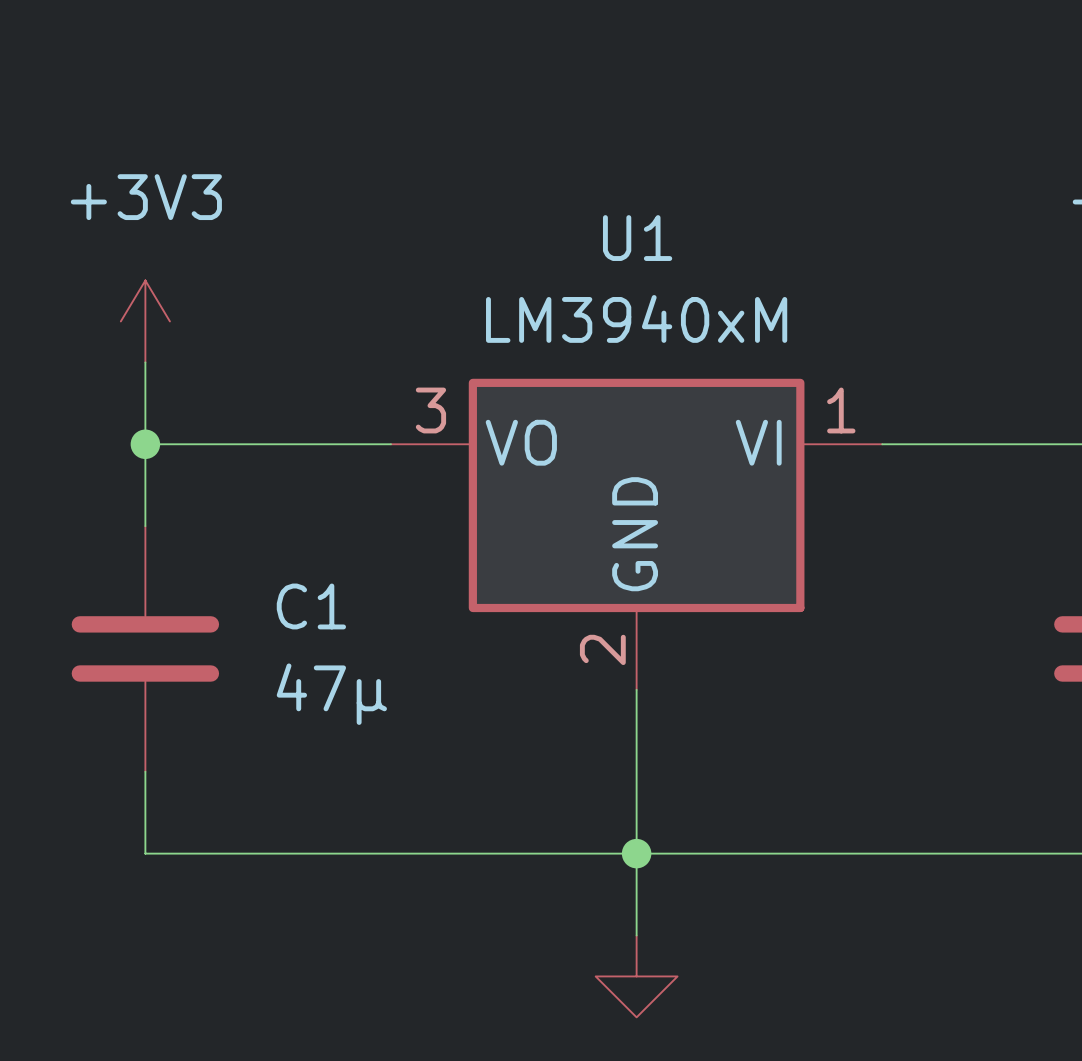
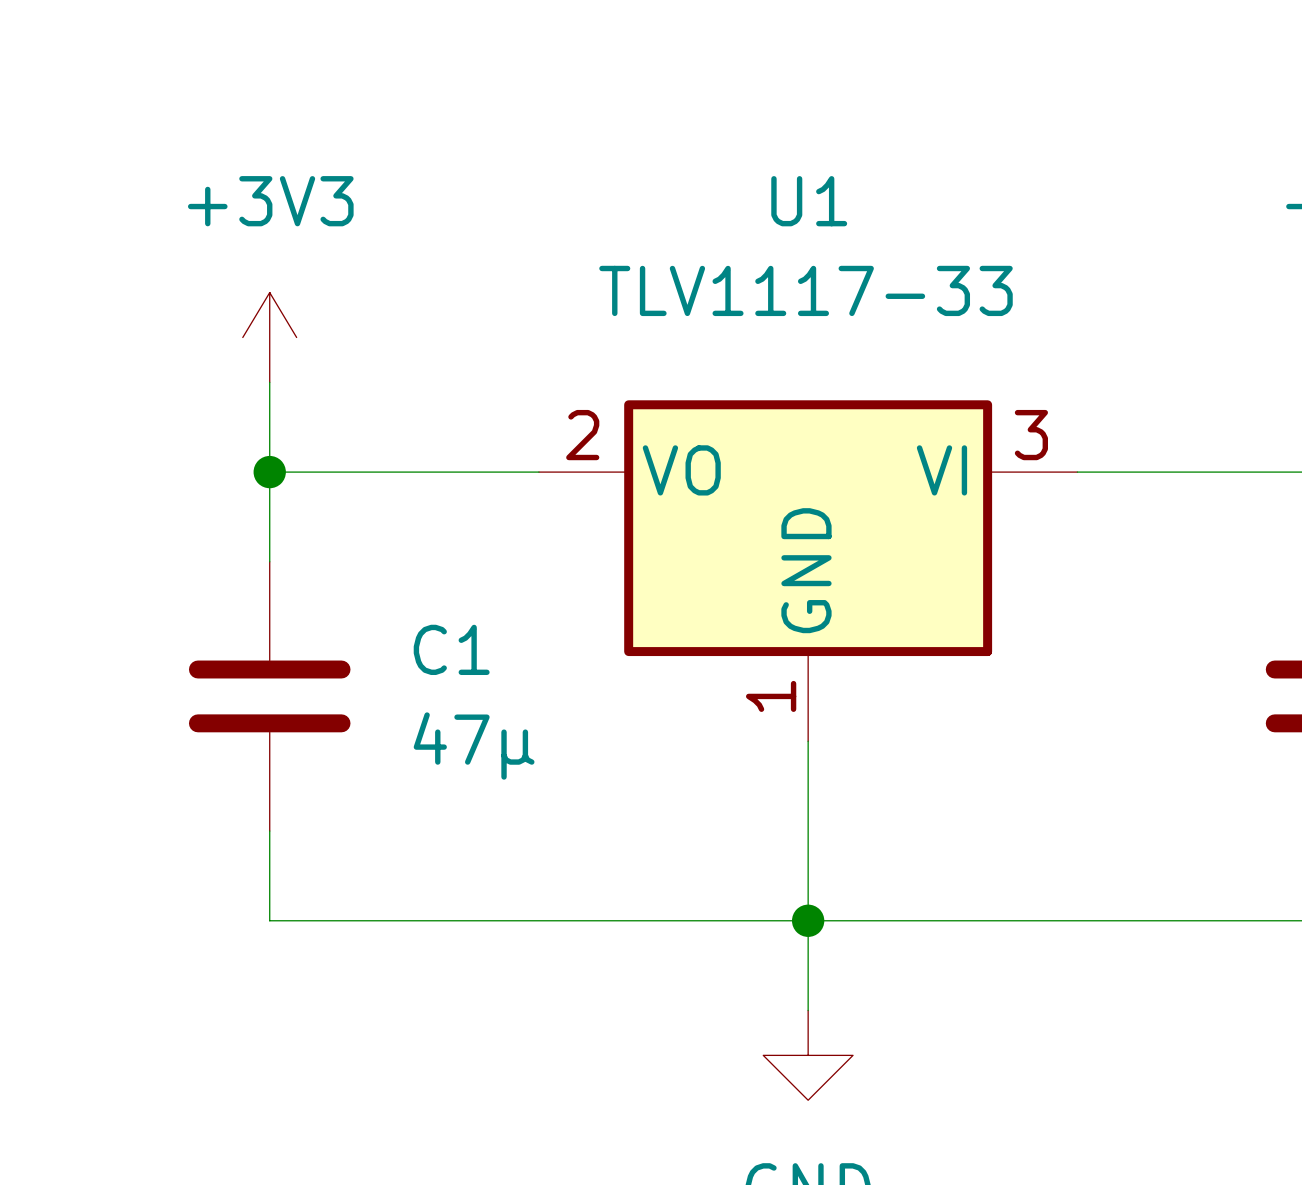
U1 name position: U1 (637, 238) -> U1 (809, 201)
U1 value: LM3940xM (636, 318) -> TLV1117-33 (806, 290)
U1 pin number: 3 (430, 410) -> 2 (582, 435)
U1 pin number: 1 (841, 410) -> 3 (1031, 435)
U1 pin number: 2 (602, 649) -> 1 (771, 696)

